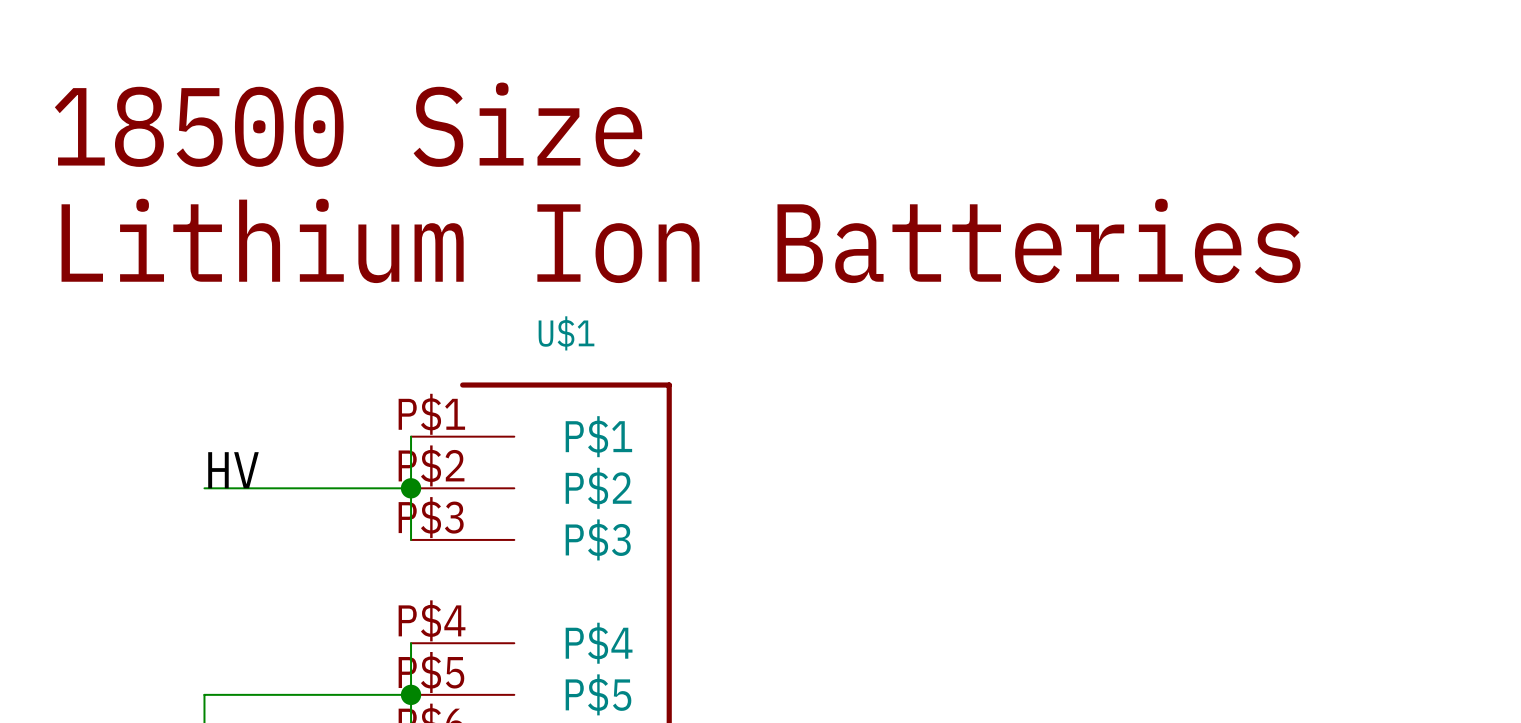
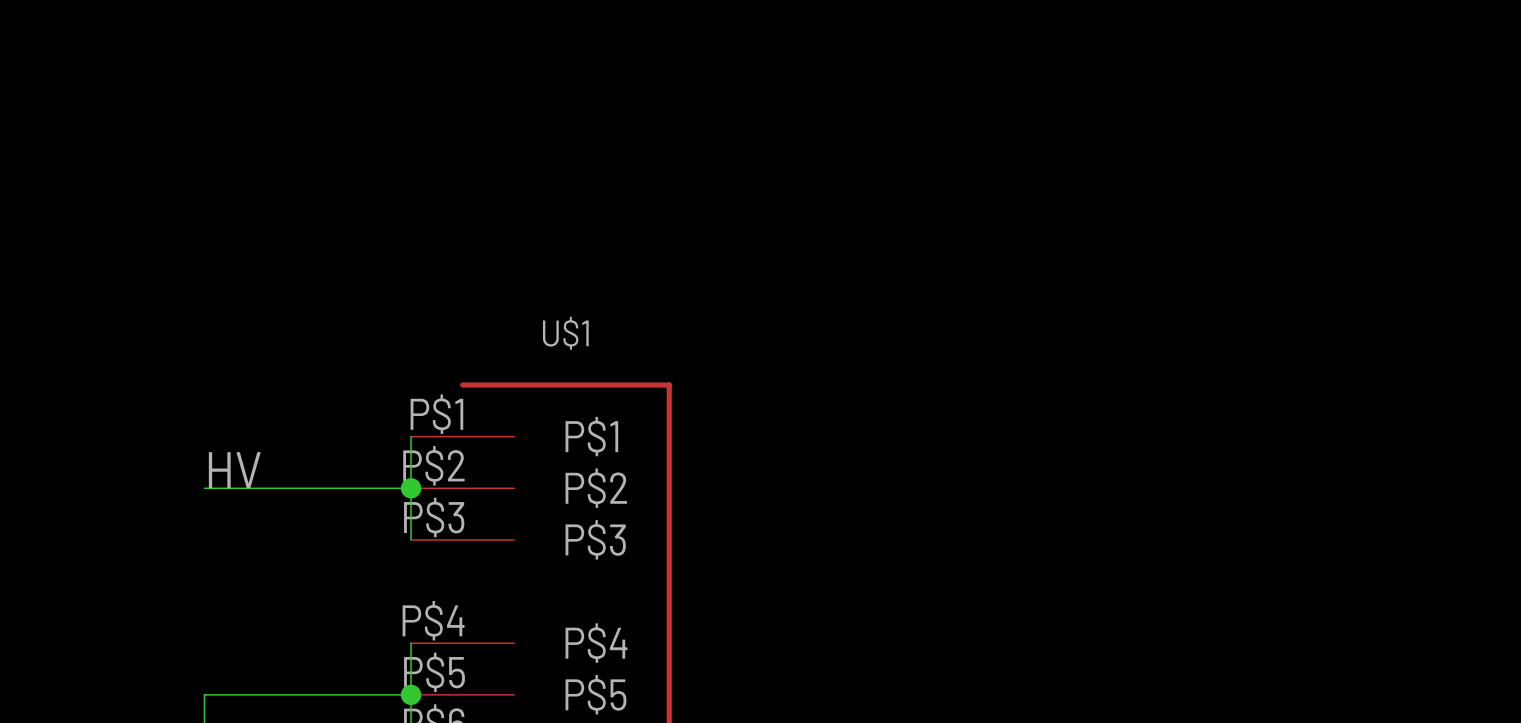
text: 18500 Size (348, 124) -> none
text: Lithium Ion Batteries (681, 240) -> none

